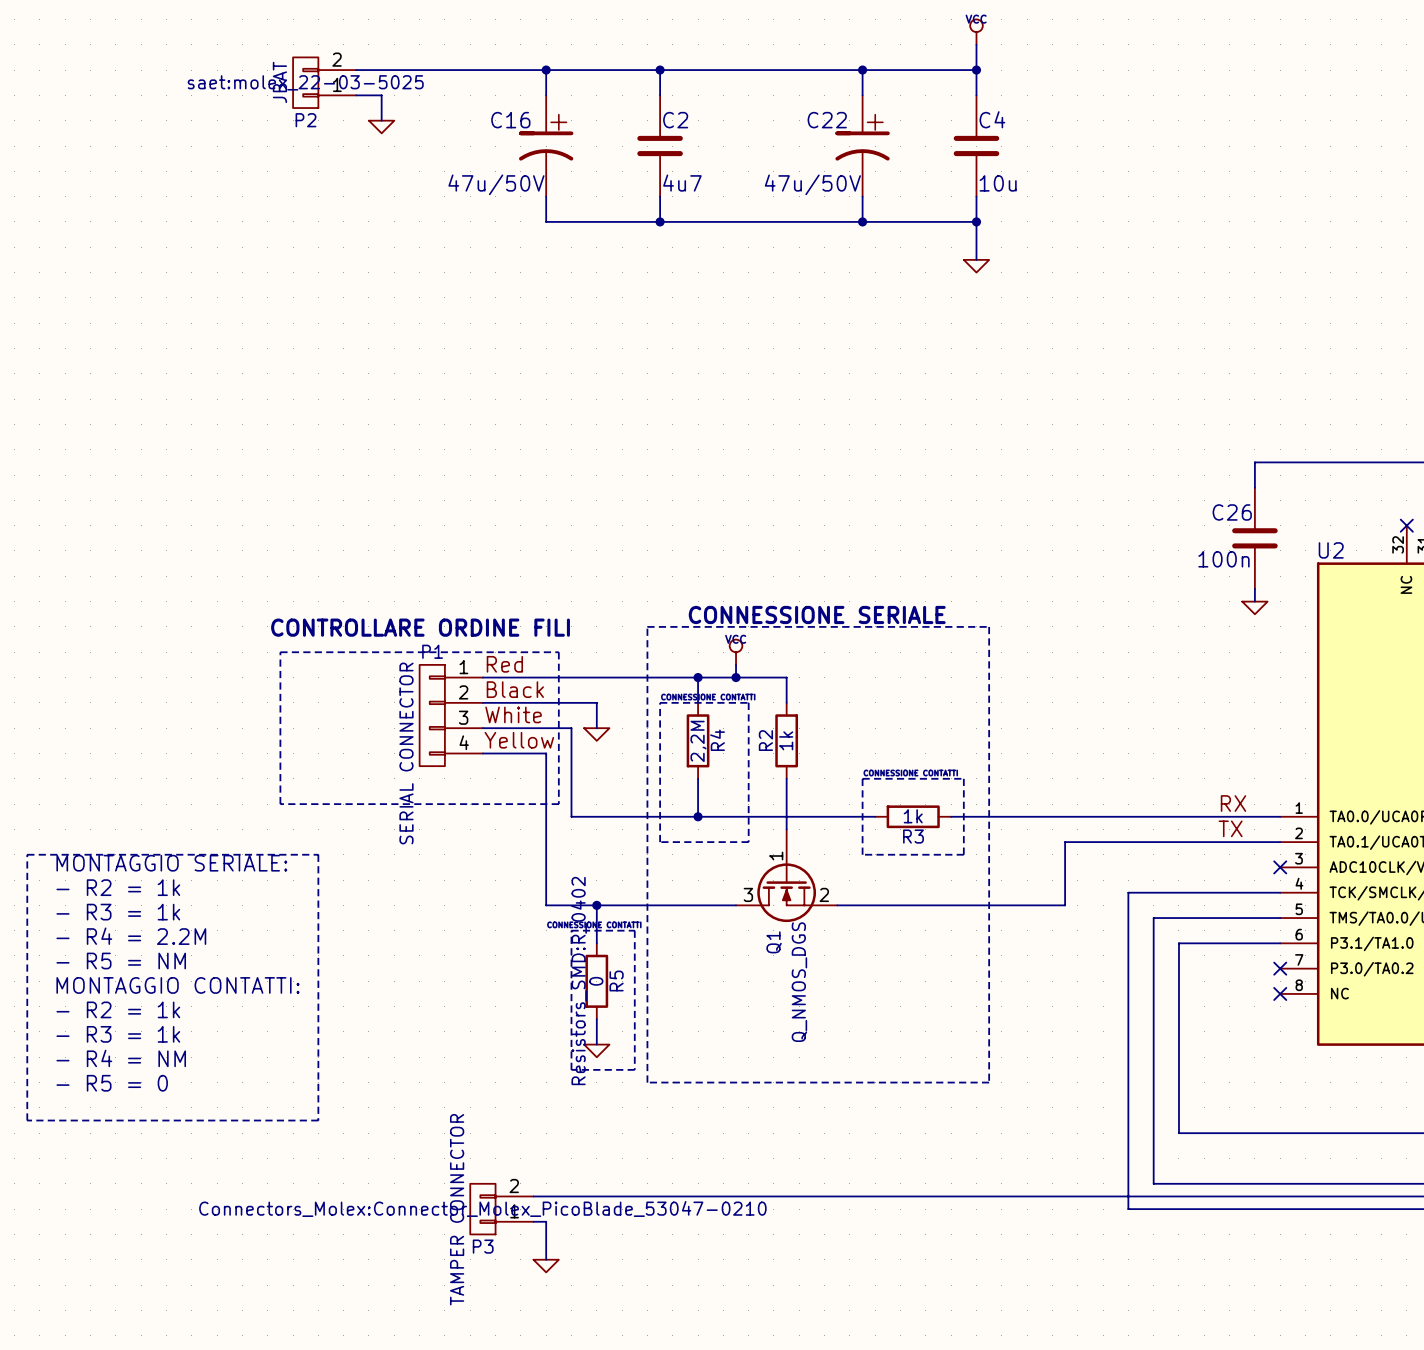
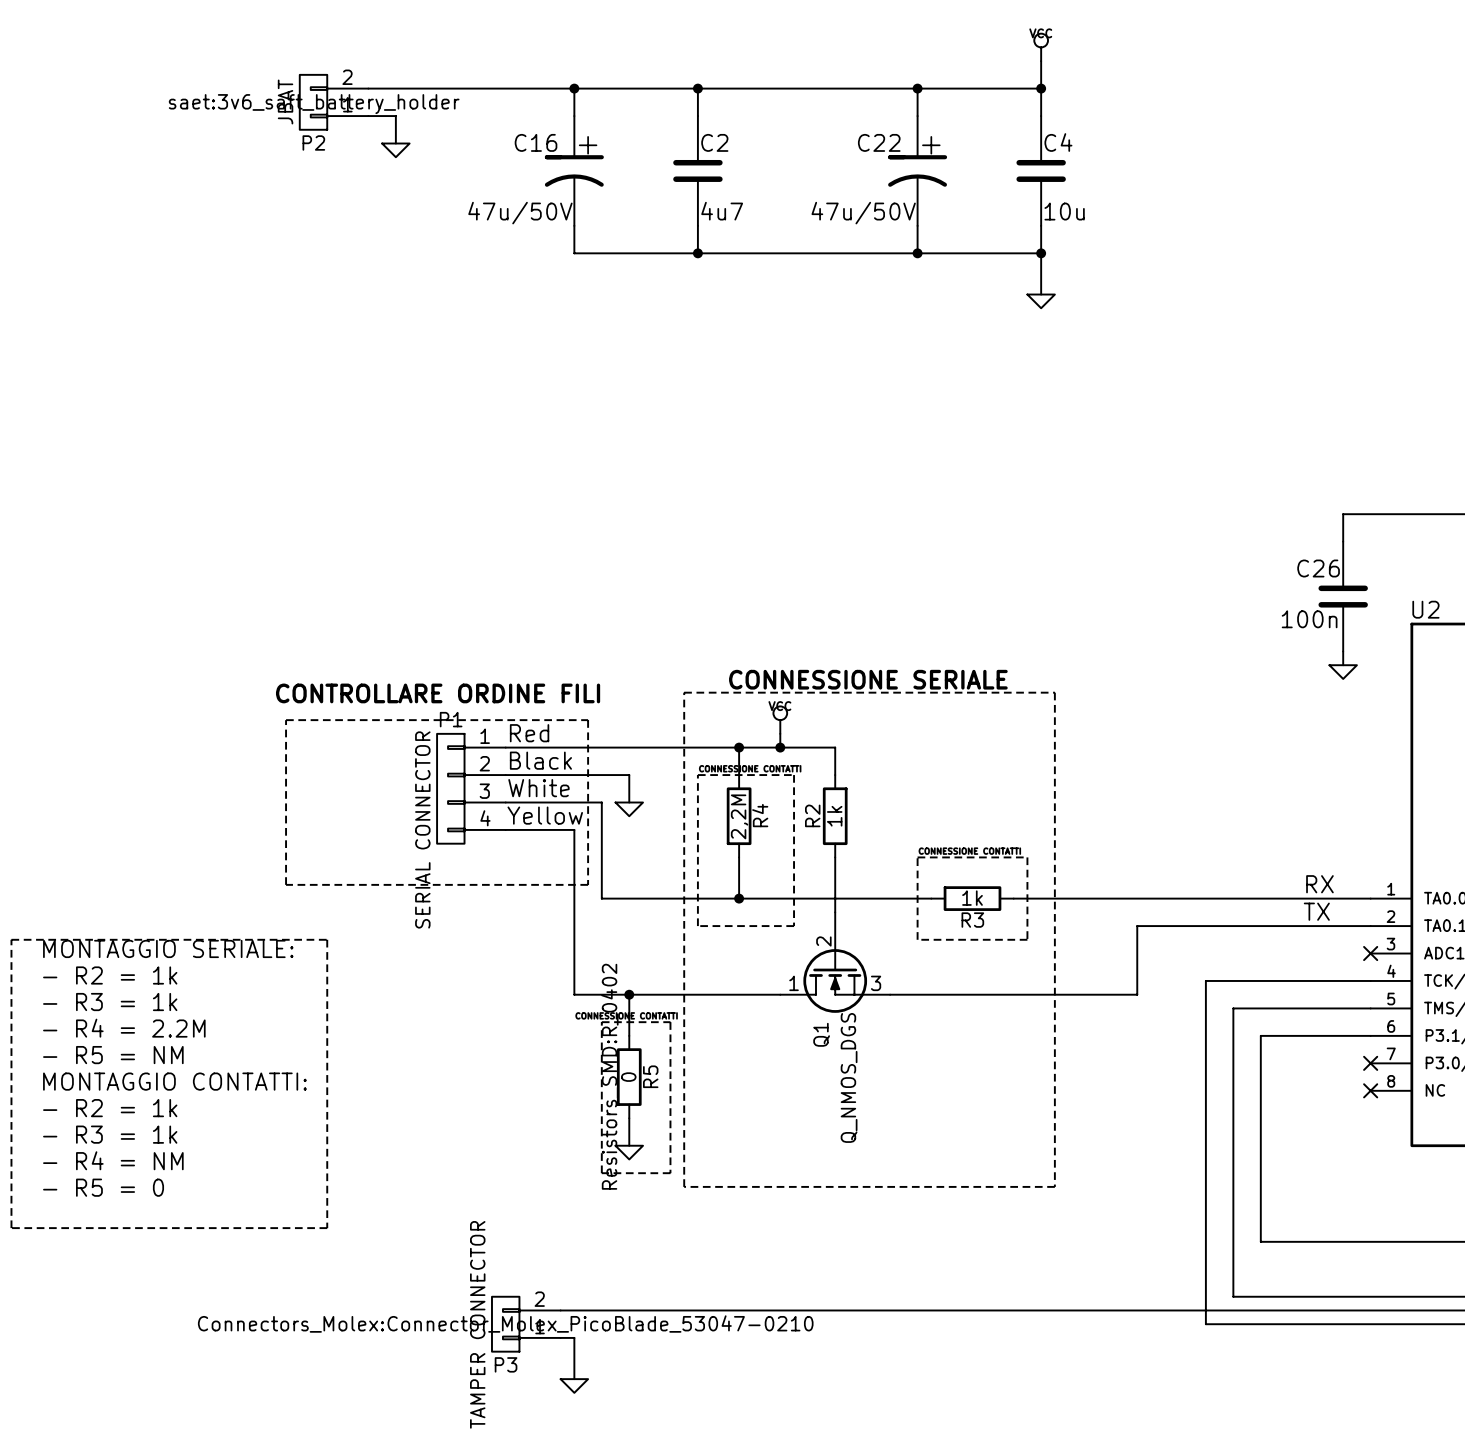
P2 text: saet:molex_22-03-5025 (305, 82) -> saet:3v6_saft_battery_holder (314, 104)
Q1 pin number: 1 (776, 856) -> 2 (823, 941)
Q1 pin number: 3 (748, 894) -> 1 (794, 983)
Q1 pin number: 2 (824, 894) -> 3 (876, 983)

